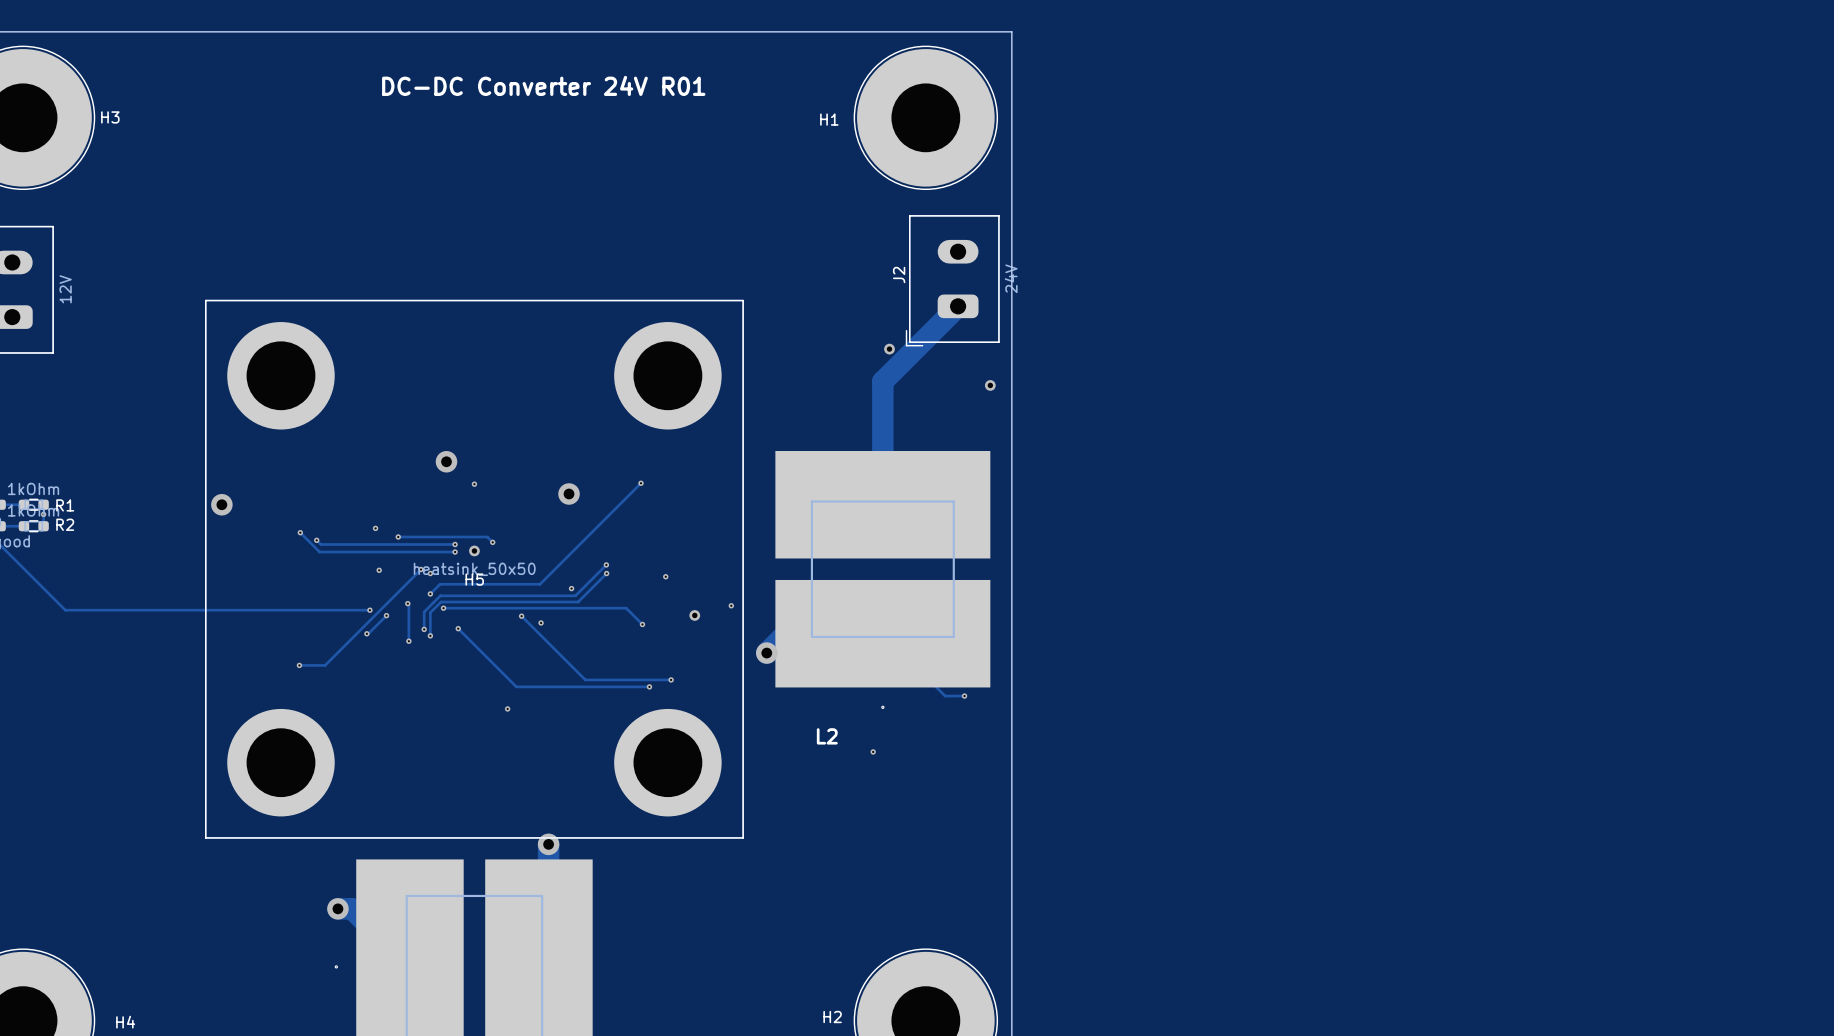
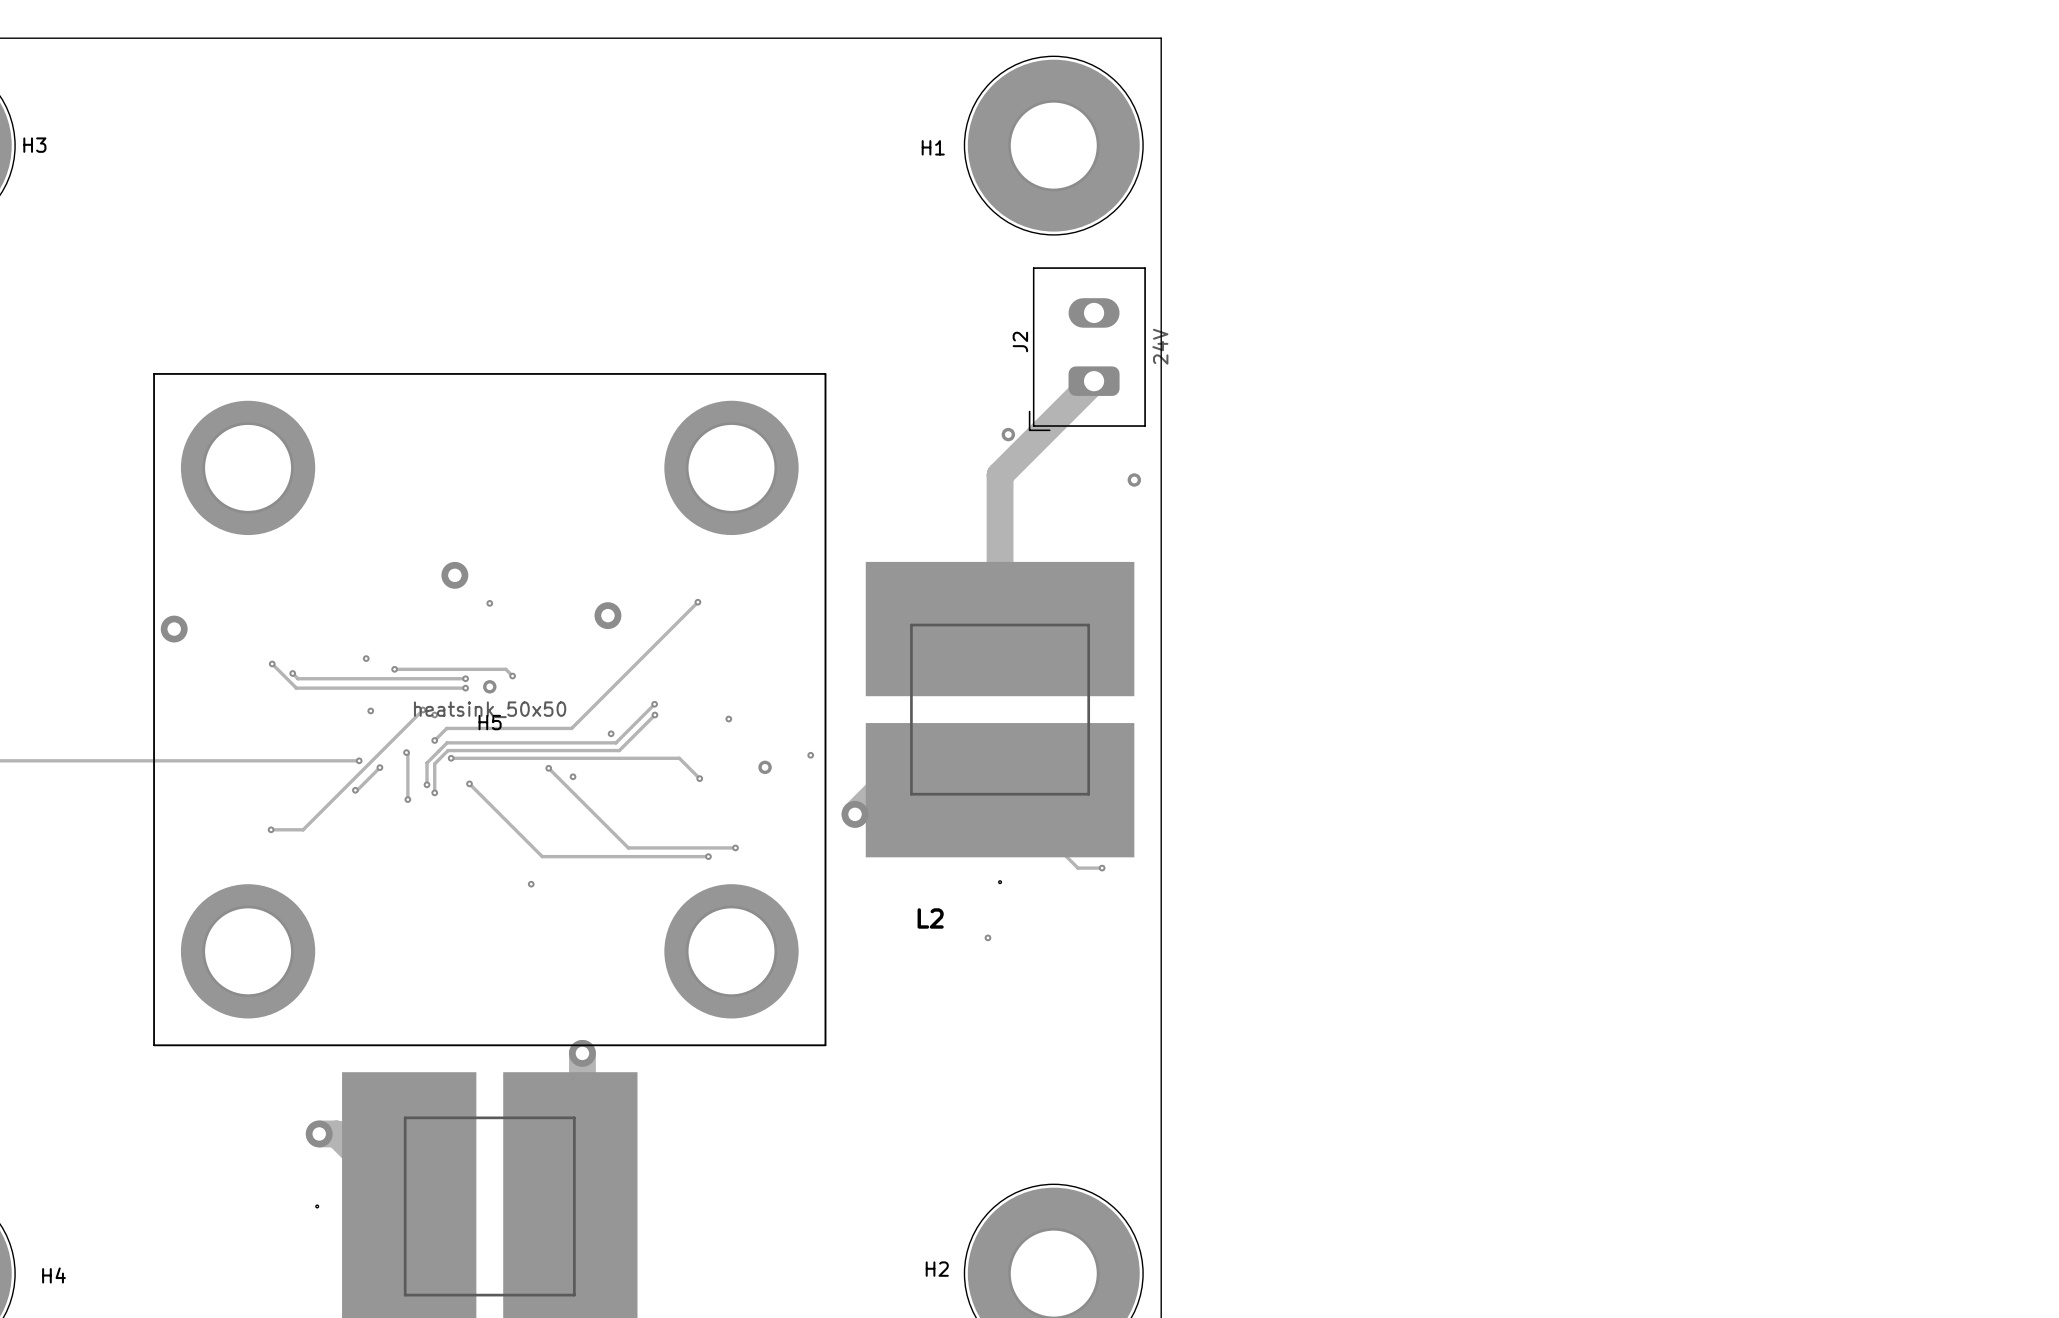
text: DC-DC Converter 24V R01 (543, 85) -> none

